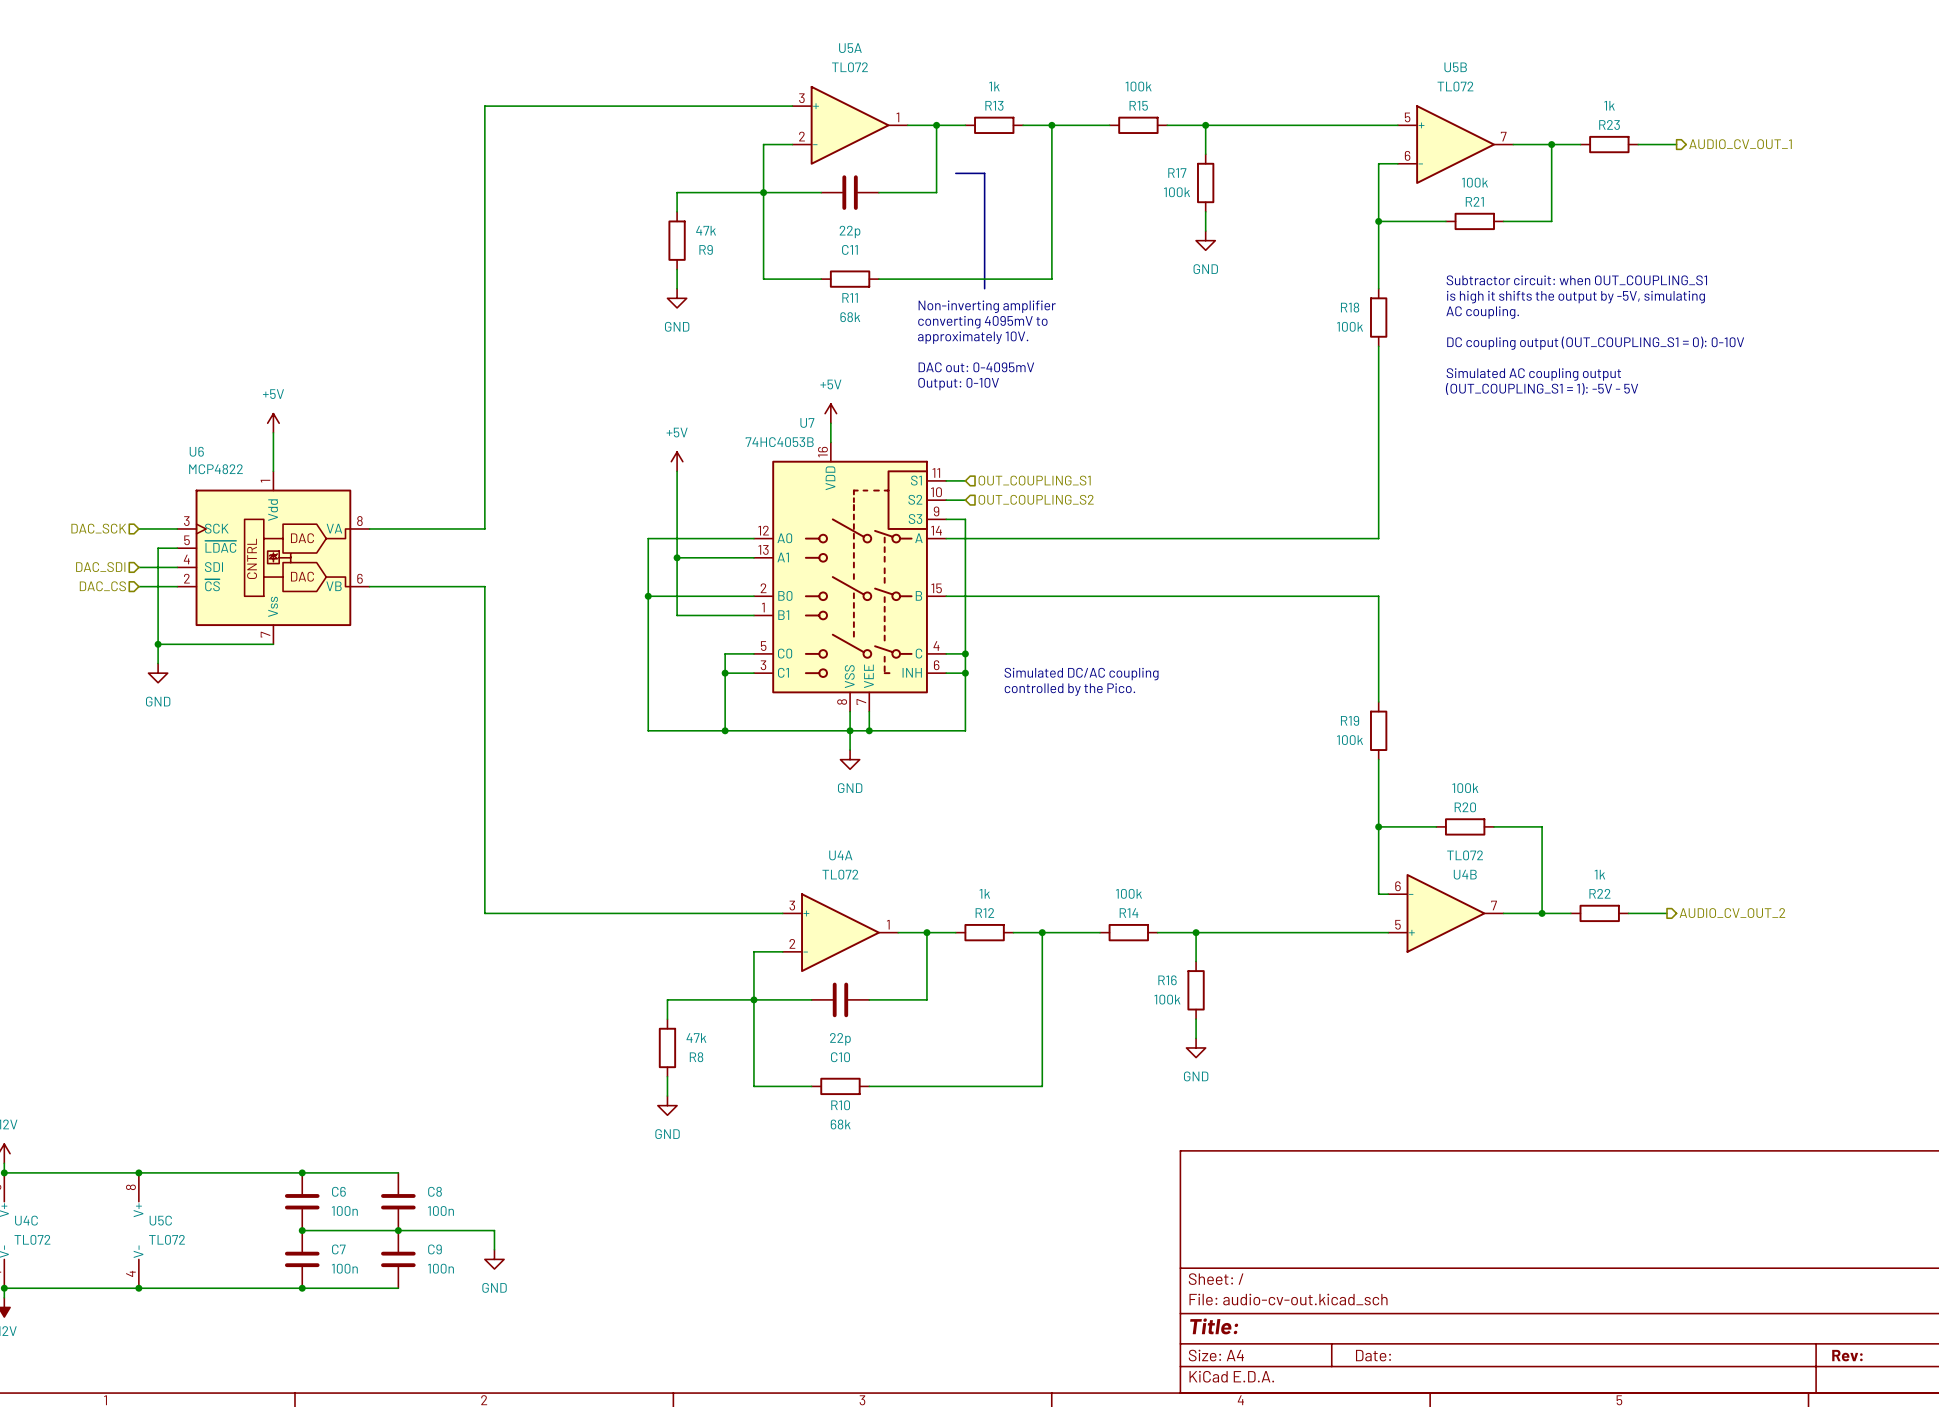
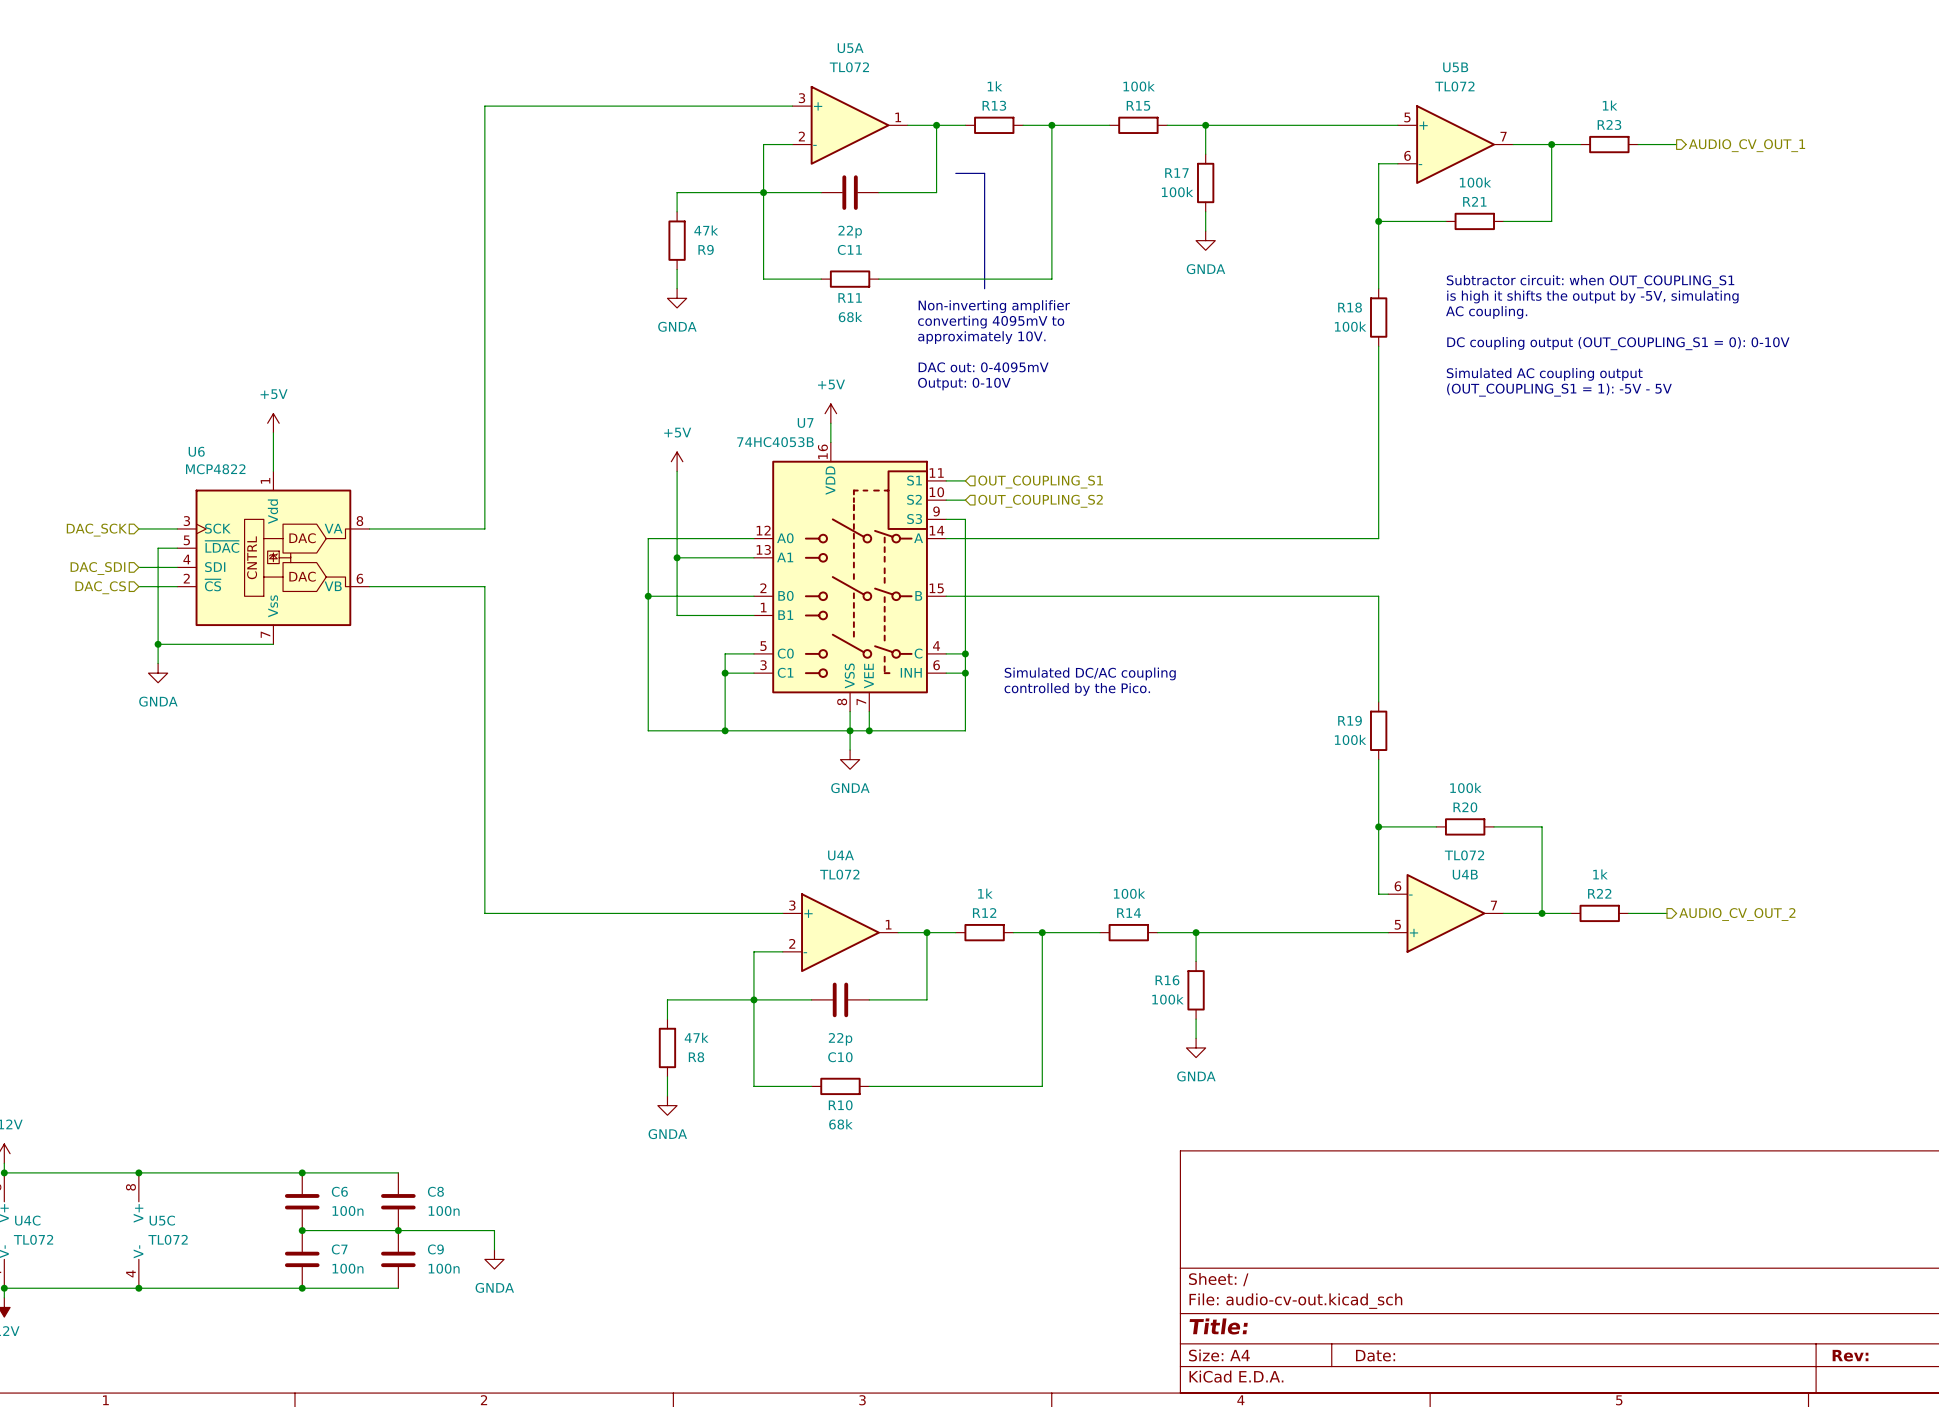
power symbol: GND (1205, 240) -> GNDA (1205, 240)
power symbol: GND (677, 298) -> GNDA (677, 298)
power symbol: GND (158, 673) -> GNDA (158, 673)
power symbol: GND (850, 759) -> GNDA (850, 759)
power symbol: GND (1196, 1047) -> GNDA (1196, 1047)
power symbol: GND (667, 1105) -> GNDA (667, 1105)
power symbol: GND (494, 1259) -> GNDA (494, 1259)

